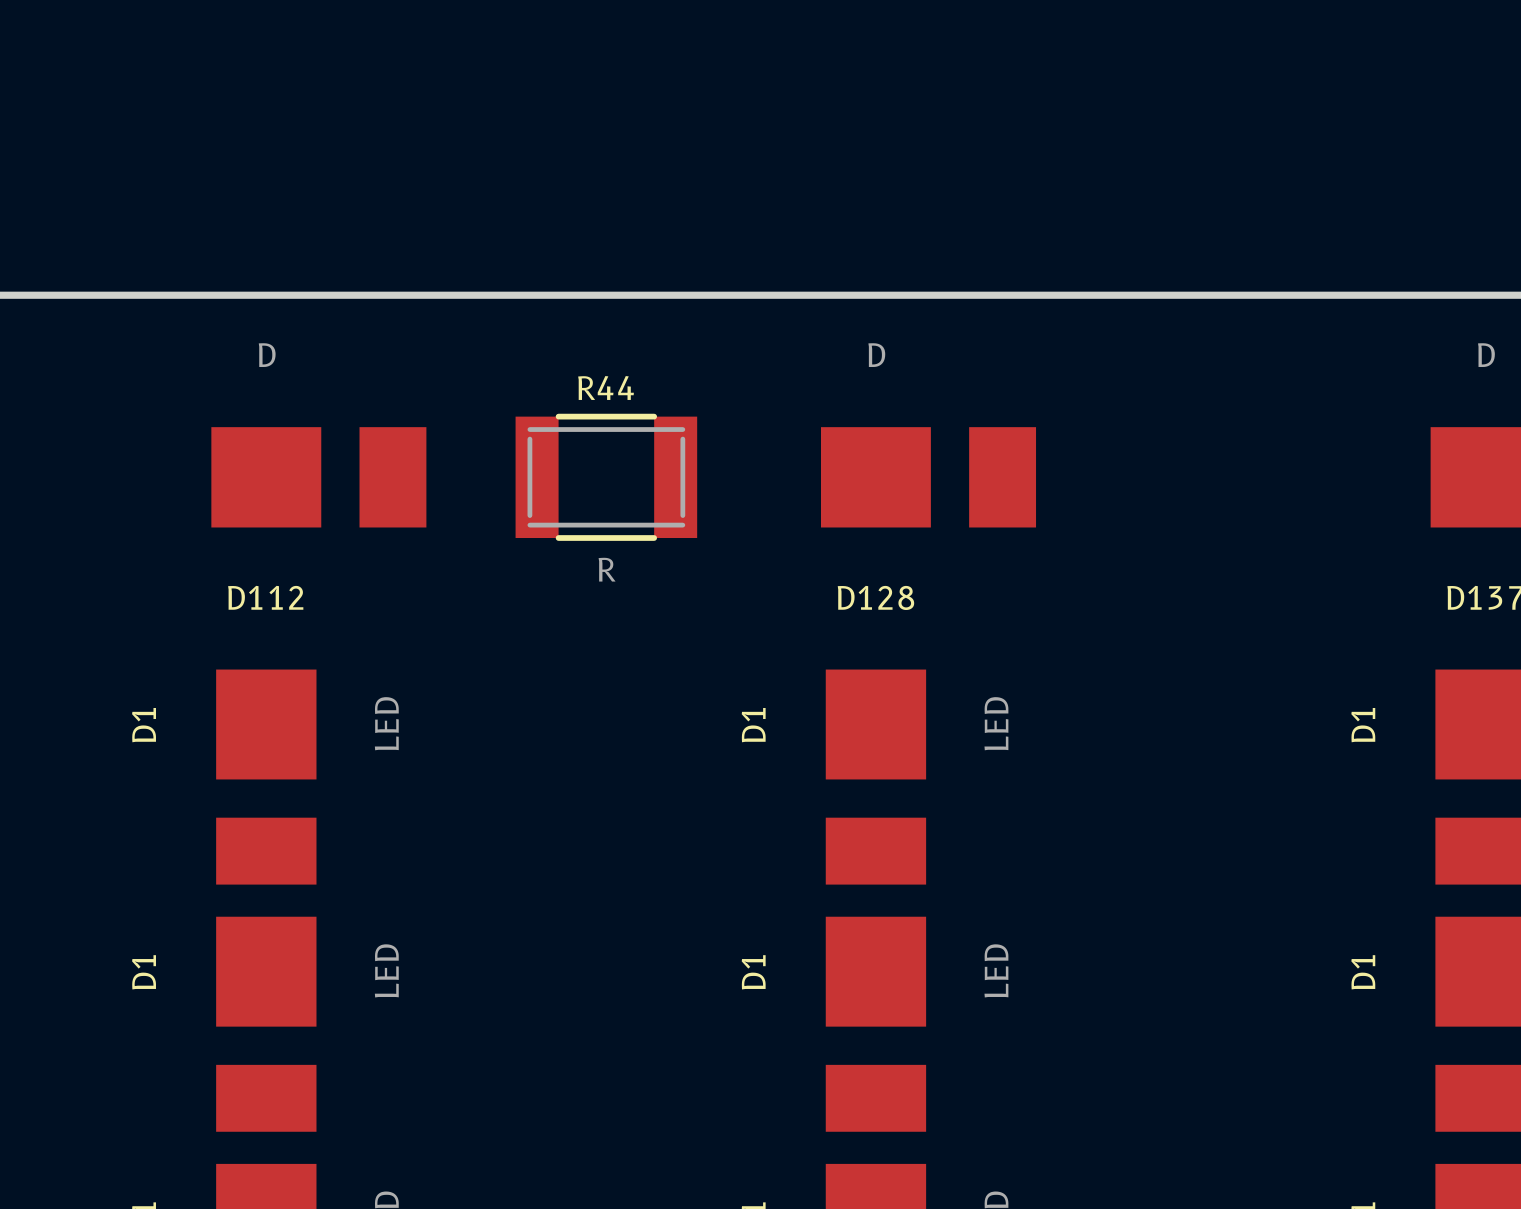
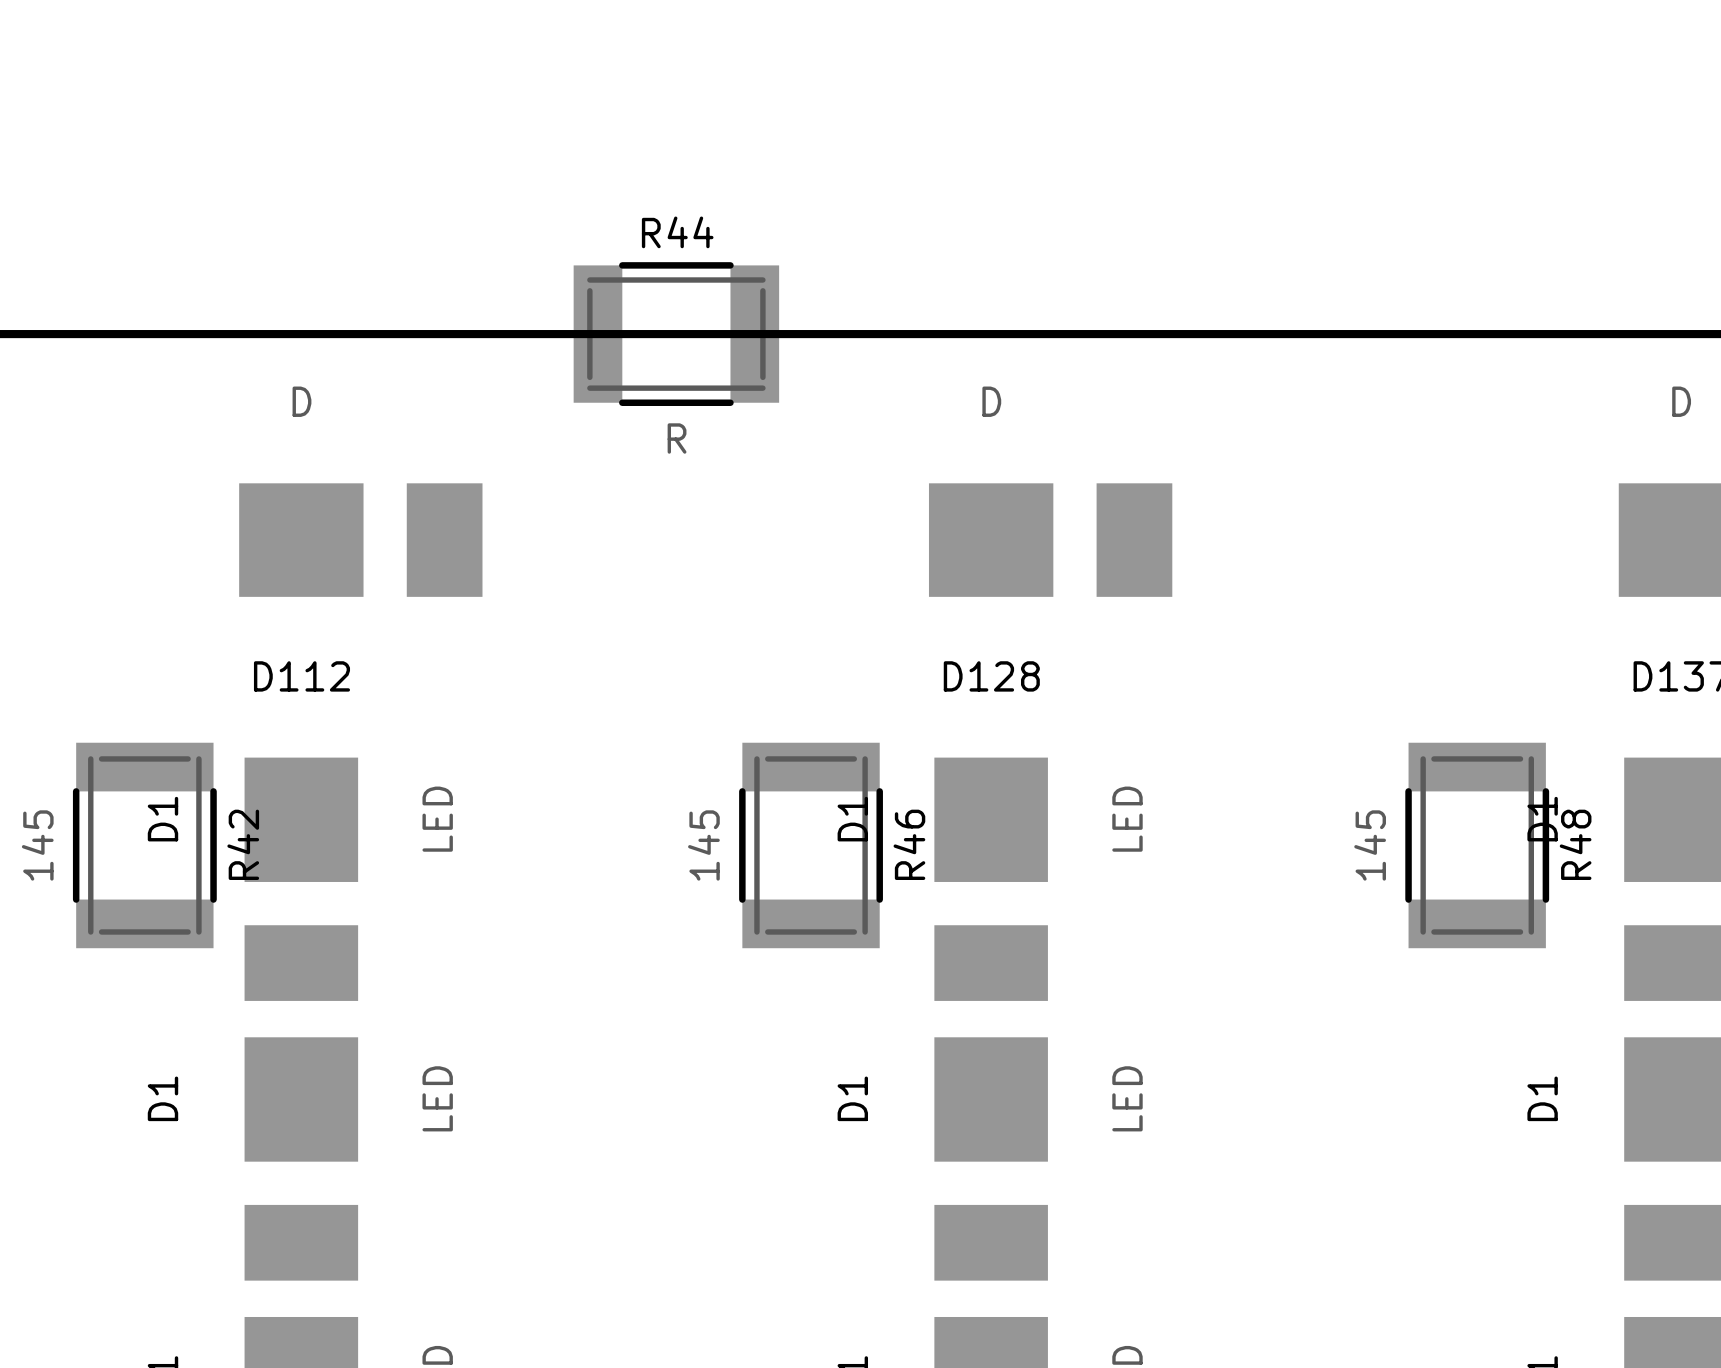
R44 position: (606, 477) -> (676, 334)
R42: none -> 145 (144, 845)
R46: none -> 145 (811, 845)
R48: none -> 145 (1477, 845)

